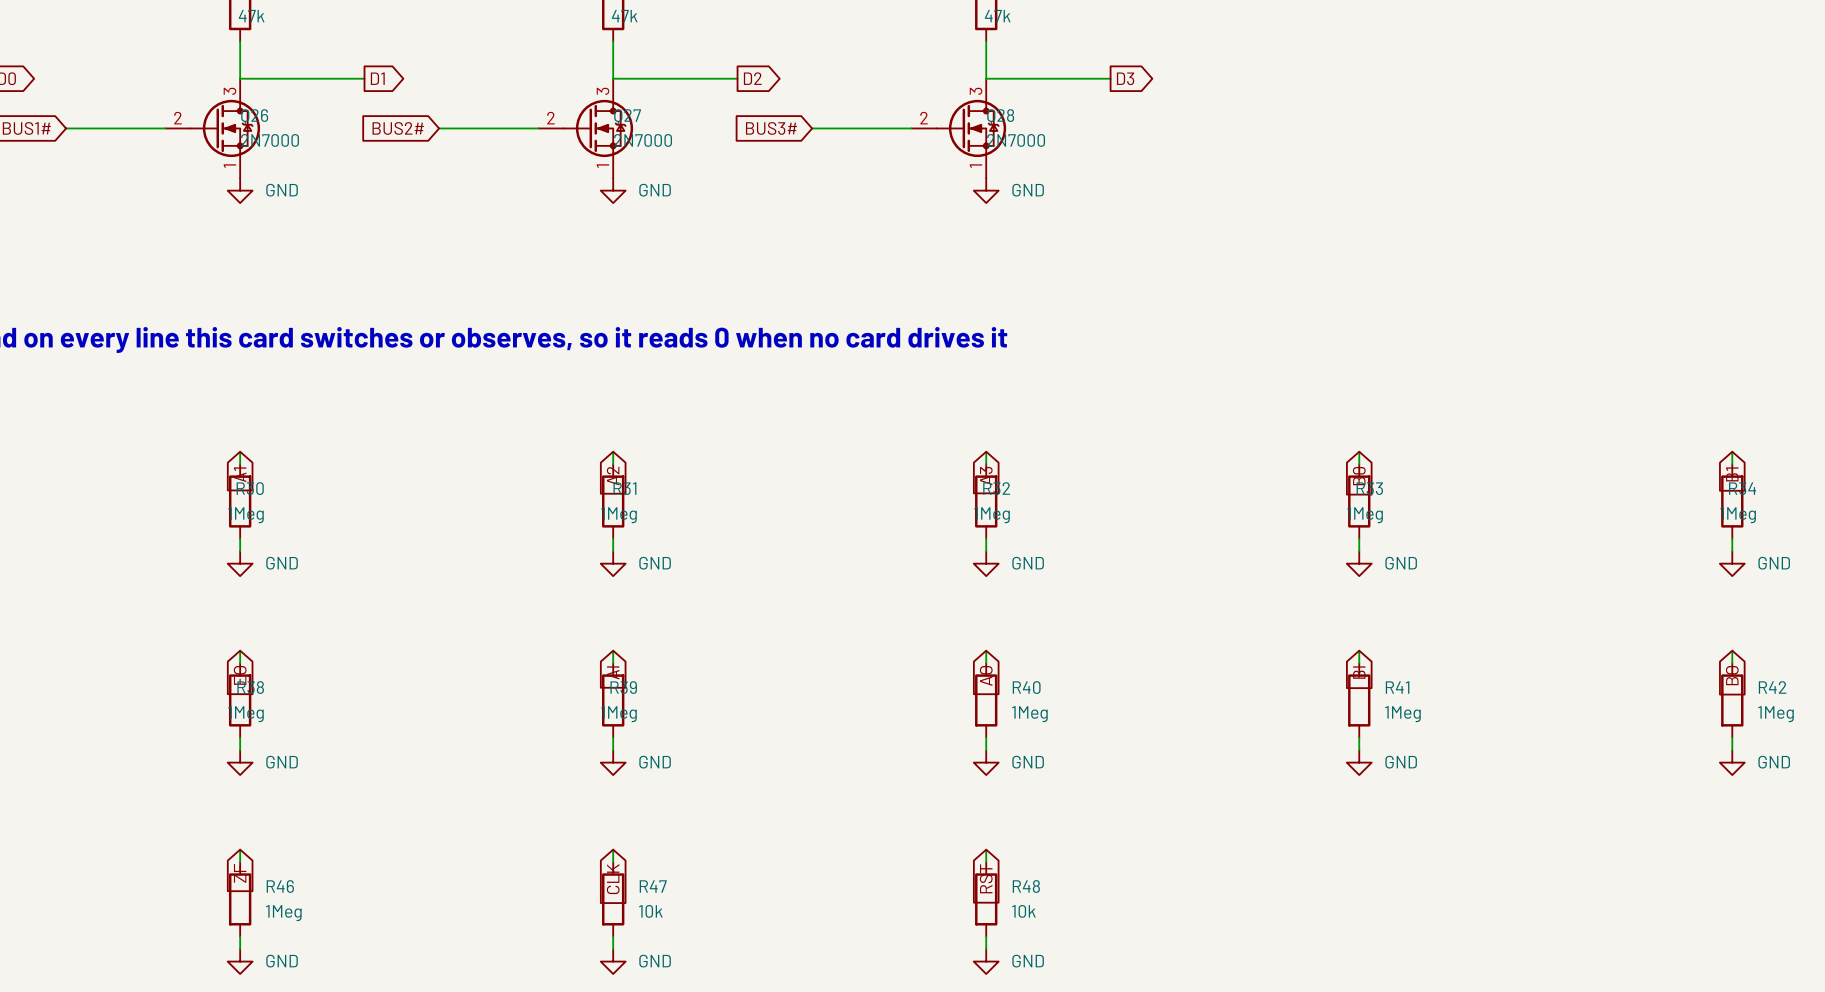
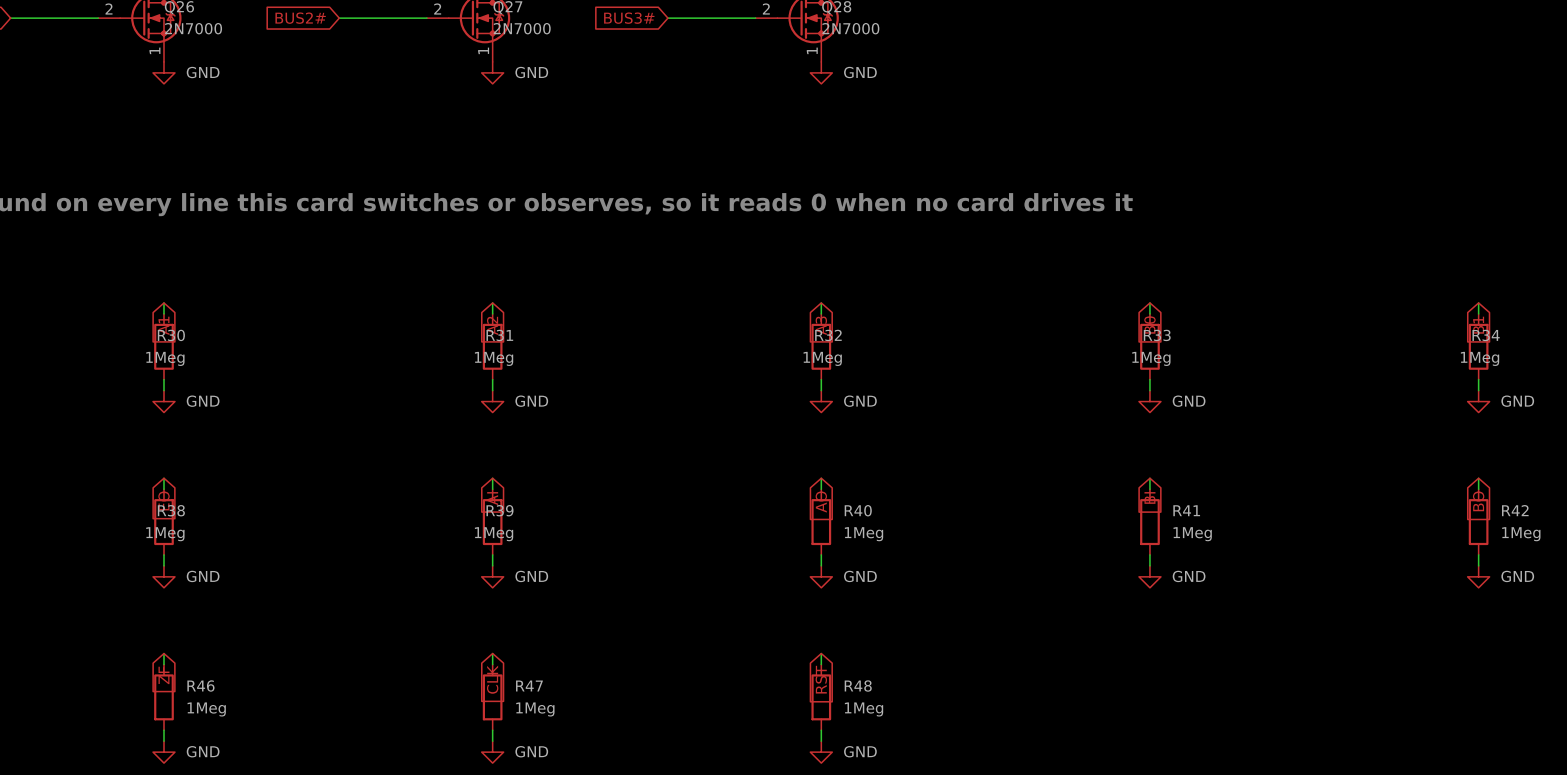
R47 value: 10k (650, 911) -> 1Meg (535, 709)
R48 value: 10k (1023, 911) -> 1Meg (864, 709)

